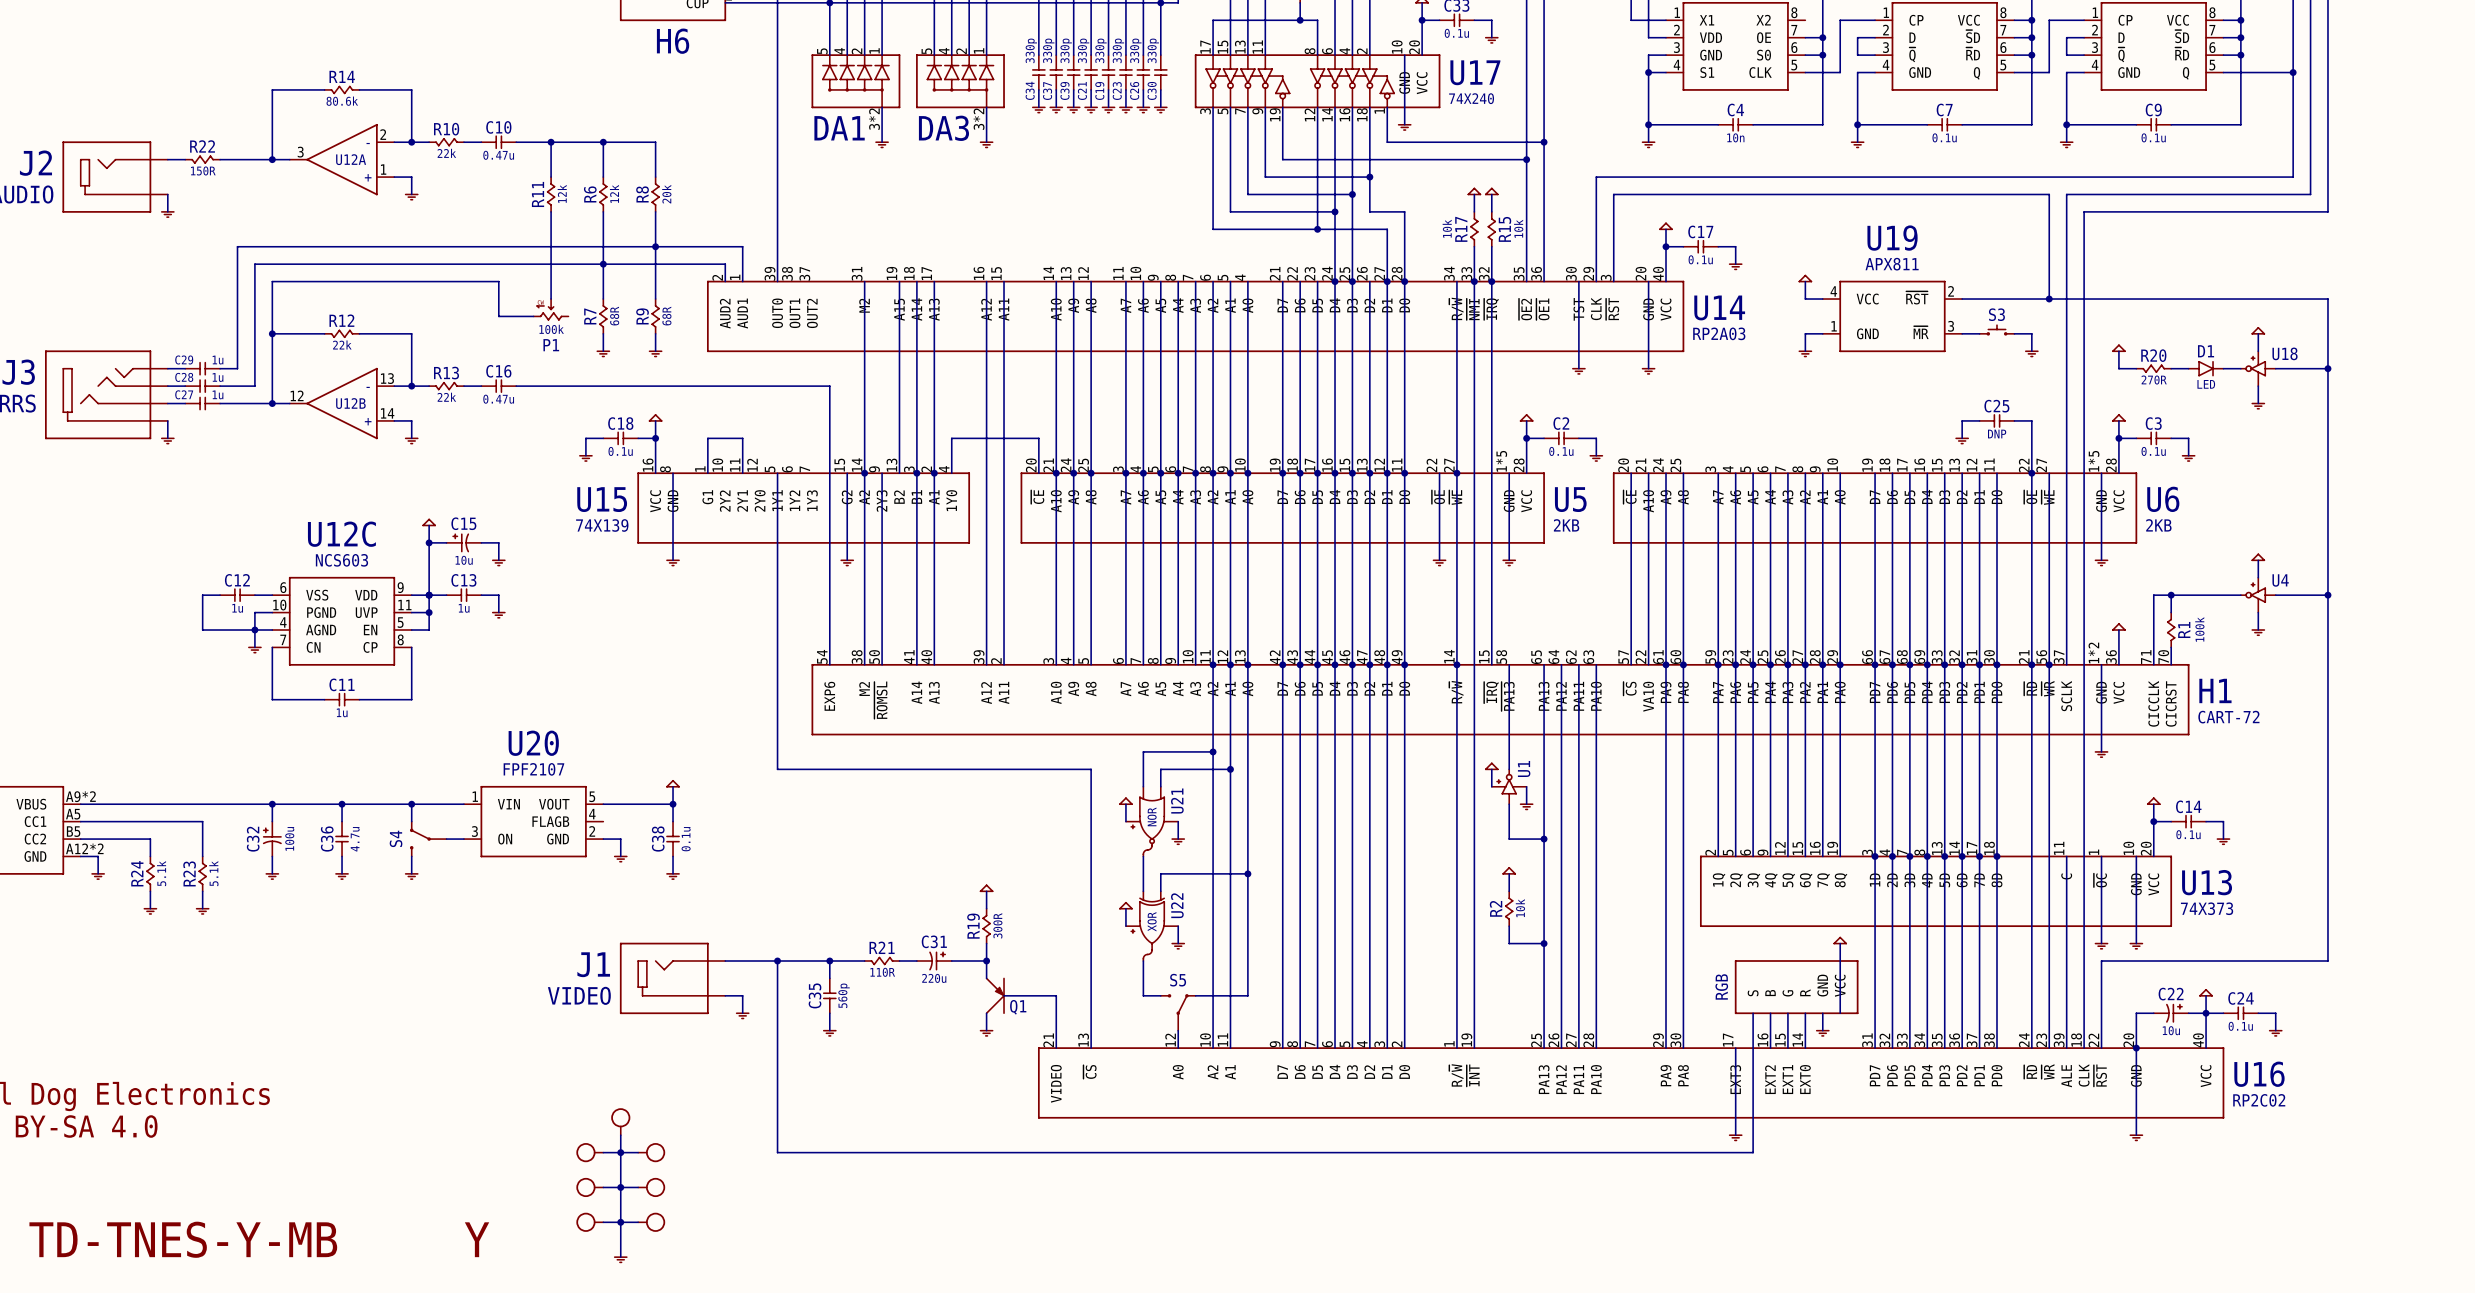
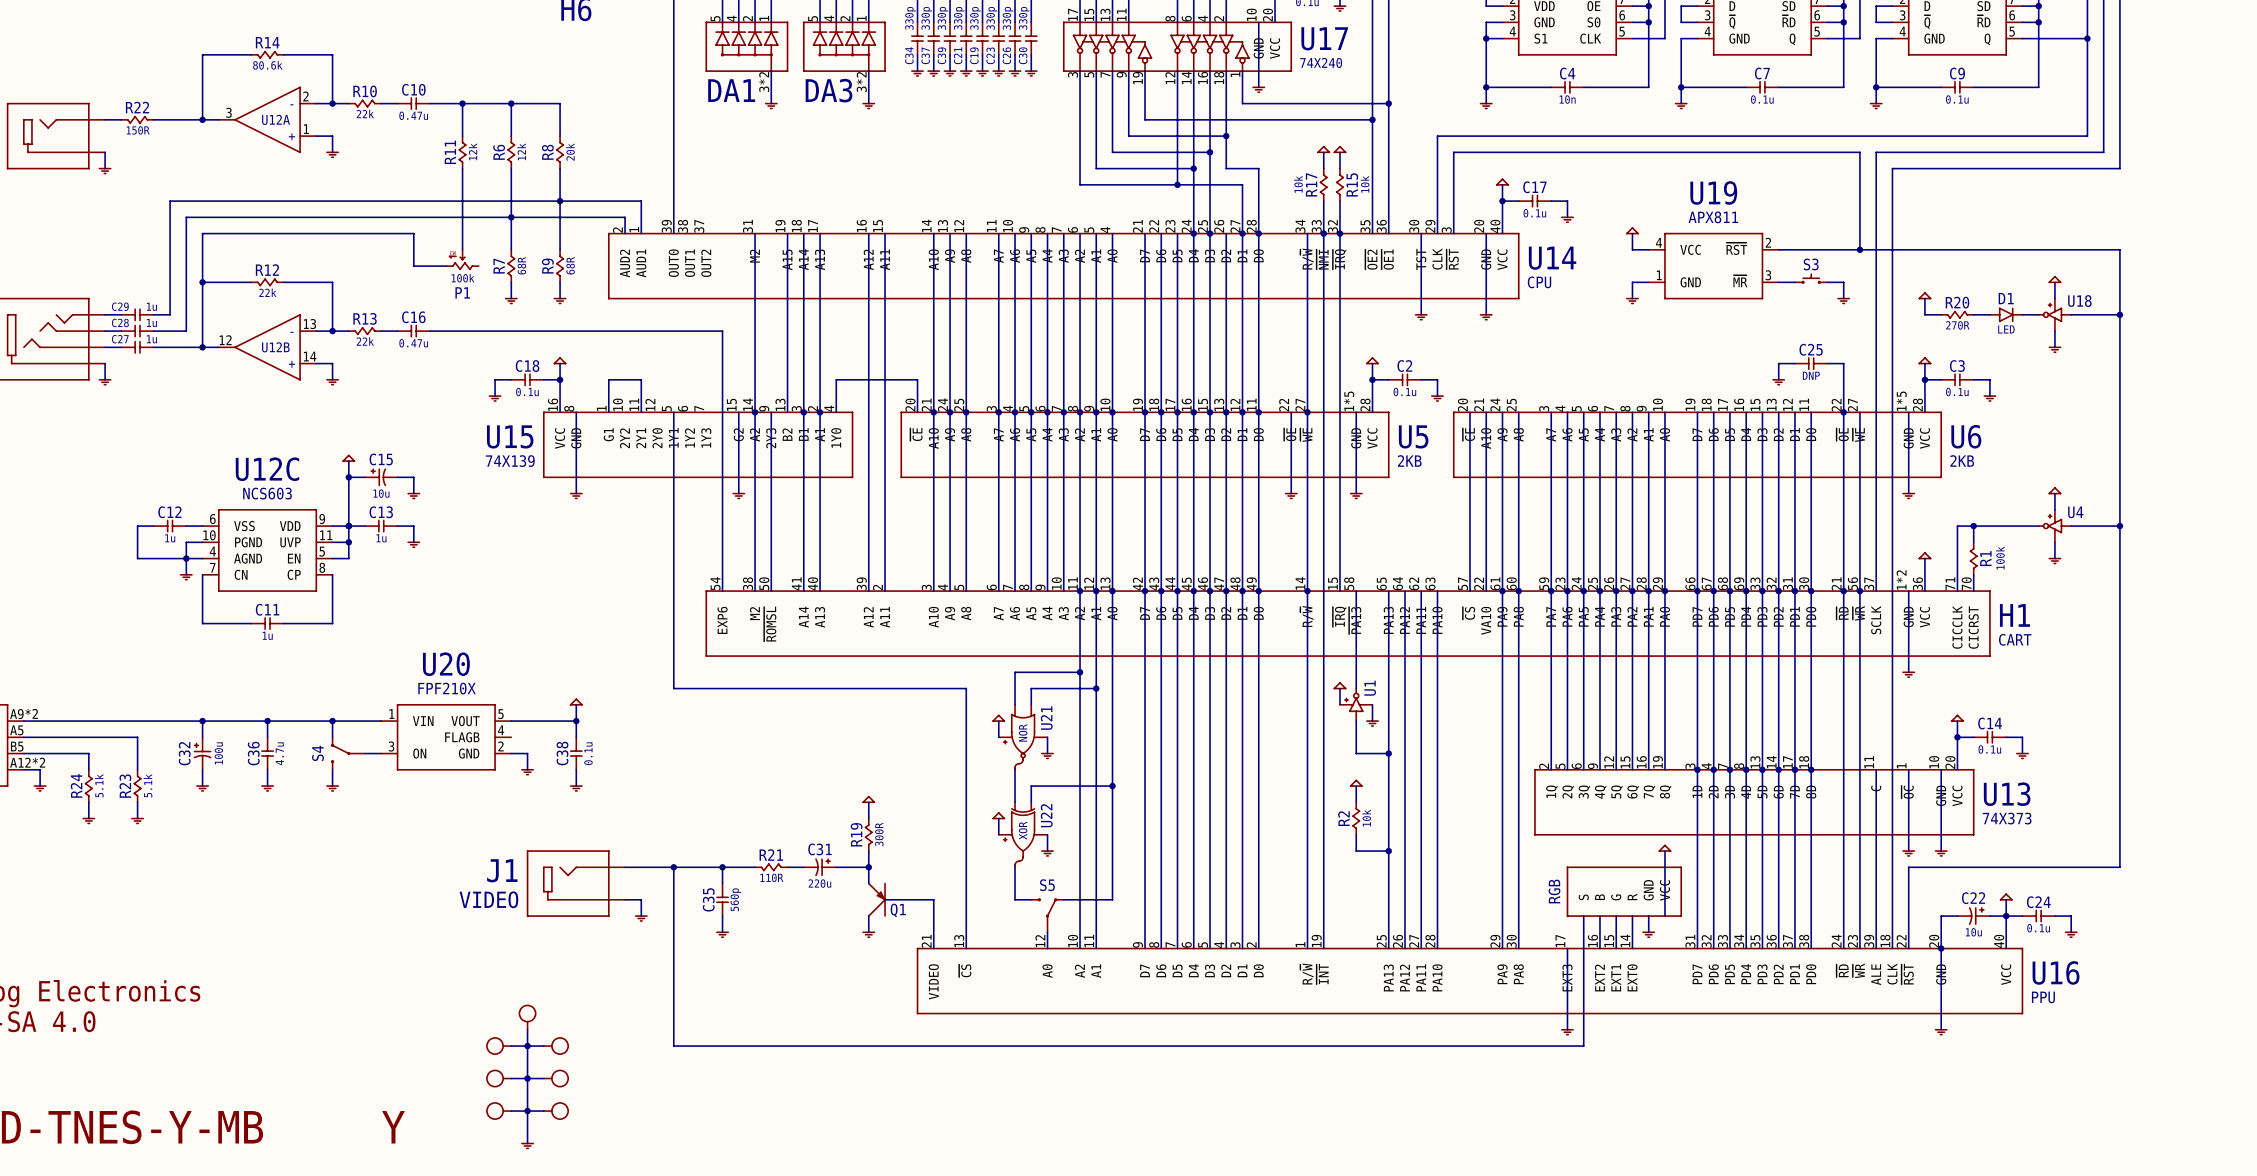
U14 value: RP2A03 (1719, 333) -> CPU (1539, 282)
H1 value: CART-72 (2228, 717) -> CART (2015, 639)
U20 value: FPF2107 (533, 769) -> FPF210X (447, 688)
U16 value: RP2C02 (2259, 1100) -> PPU (2043, 997)

